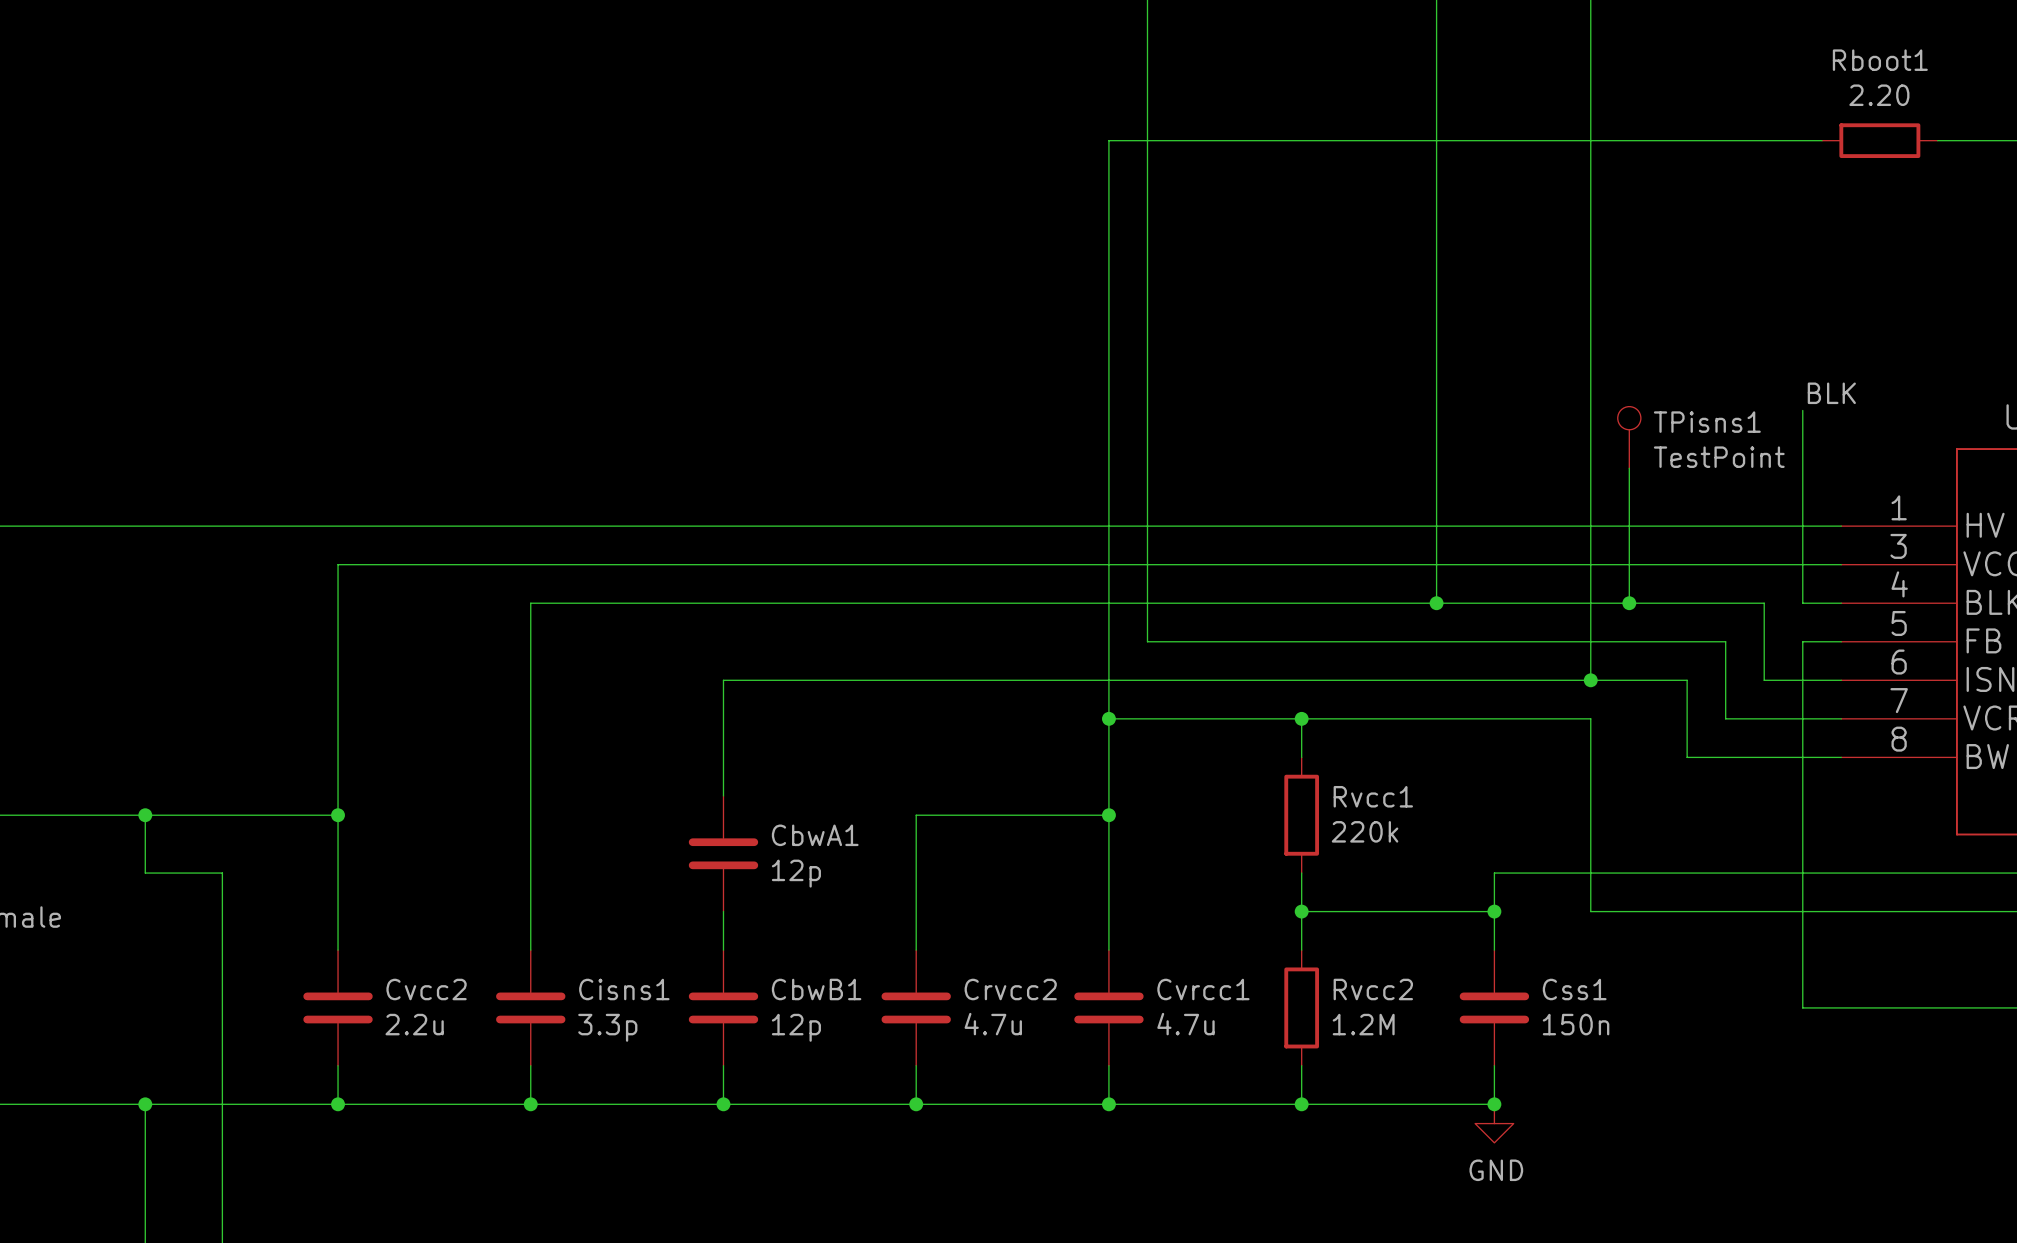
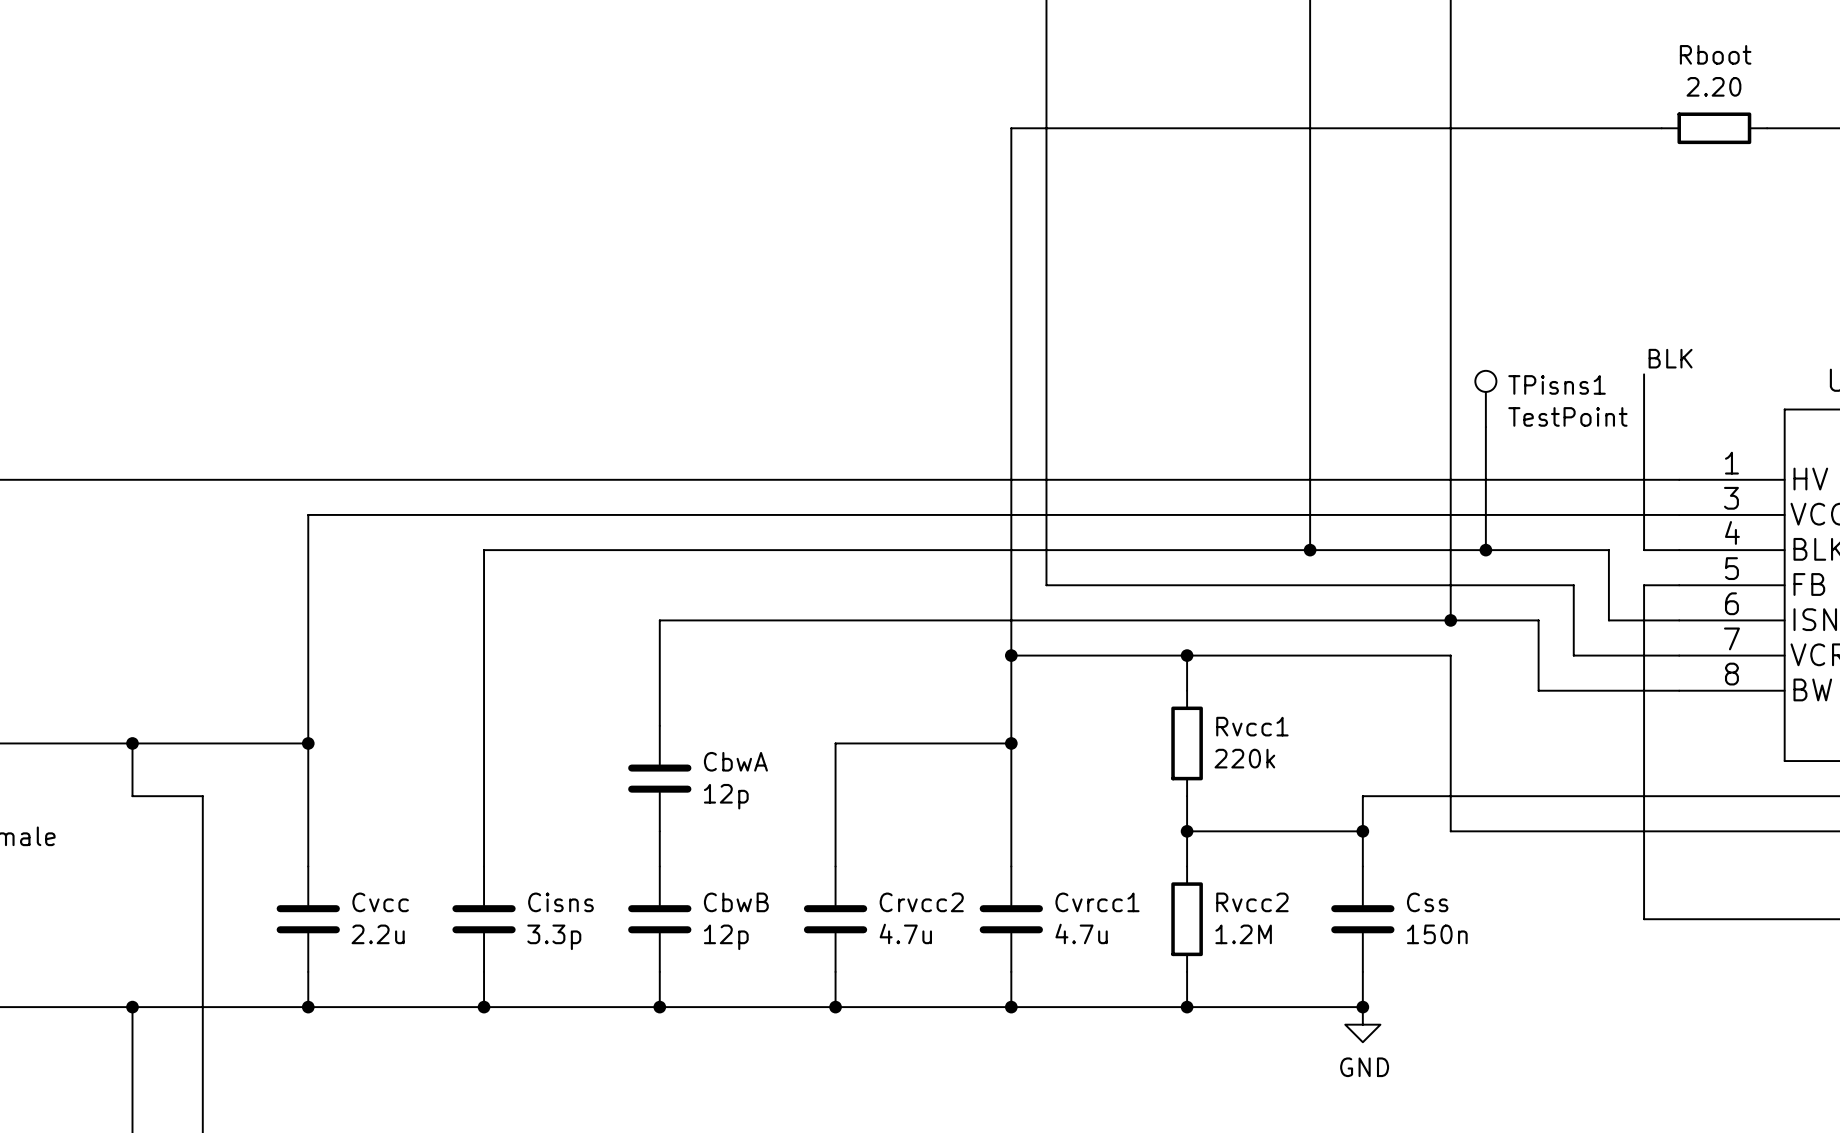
Rboot1 name: Rboot1 (1880, 60) -> Rboot (1715, 54)
CbwA1 name: CbwA1 (815, 835) -> CbwA (735, 761)
Cvcc2 name: Cvcc2 (426, 989) -> Cvcc (380, 902)
Cisns1 name: Cisns1 (624, 989) -> Cisns (560, 902)
CbwB1 name: CbwB1 (816, 989) -> CbwB (736, 902)
Css1 name: Css1 (1574, 989) -> Css (1427, 902)

